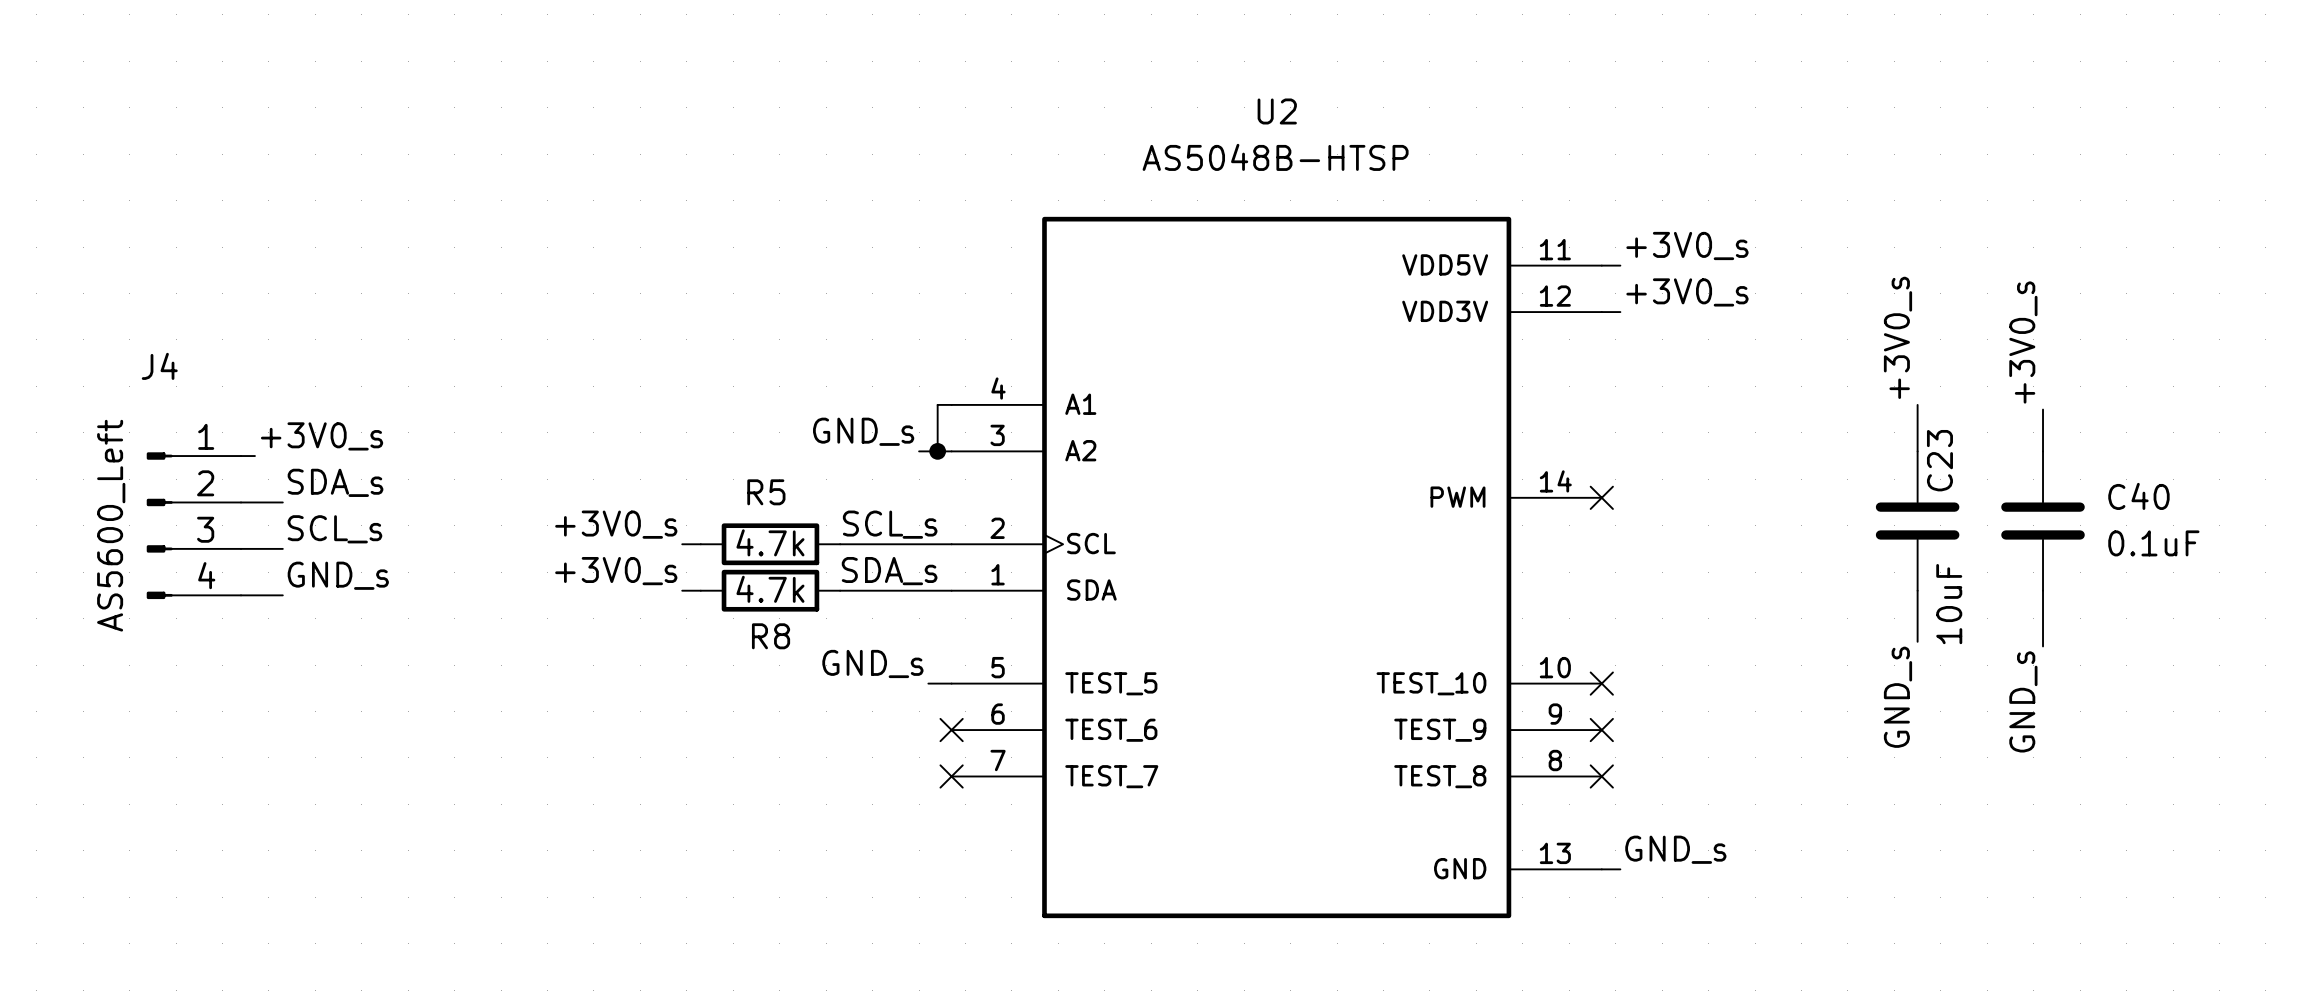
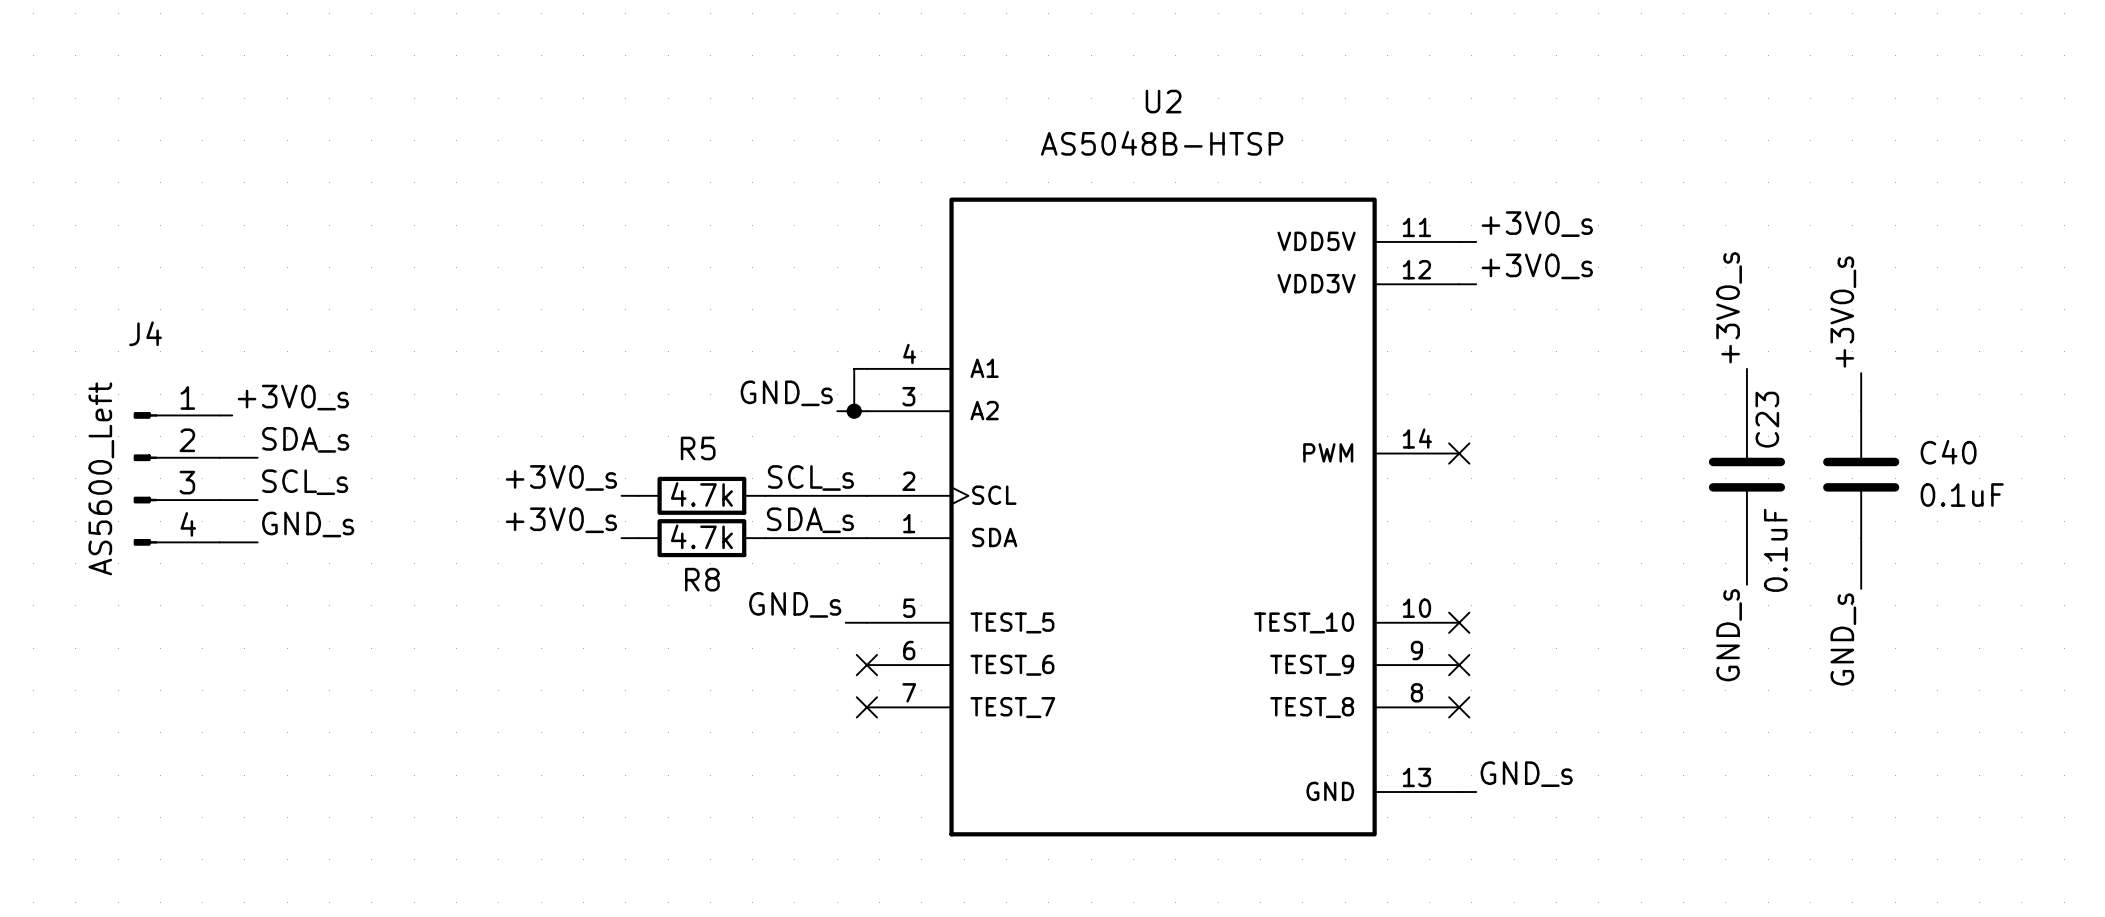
C23 value: 10uF (1949, 604) -> 0.1uF (1775, 550)

